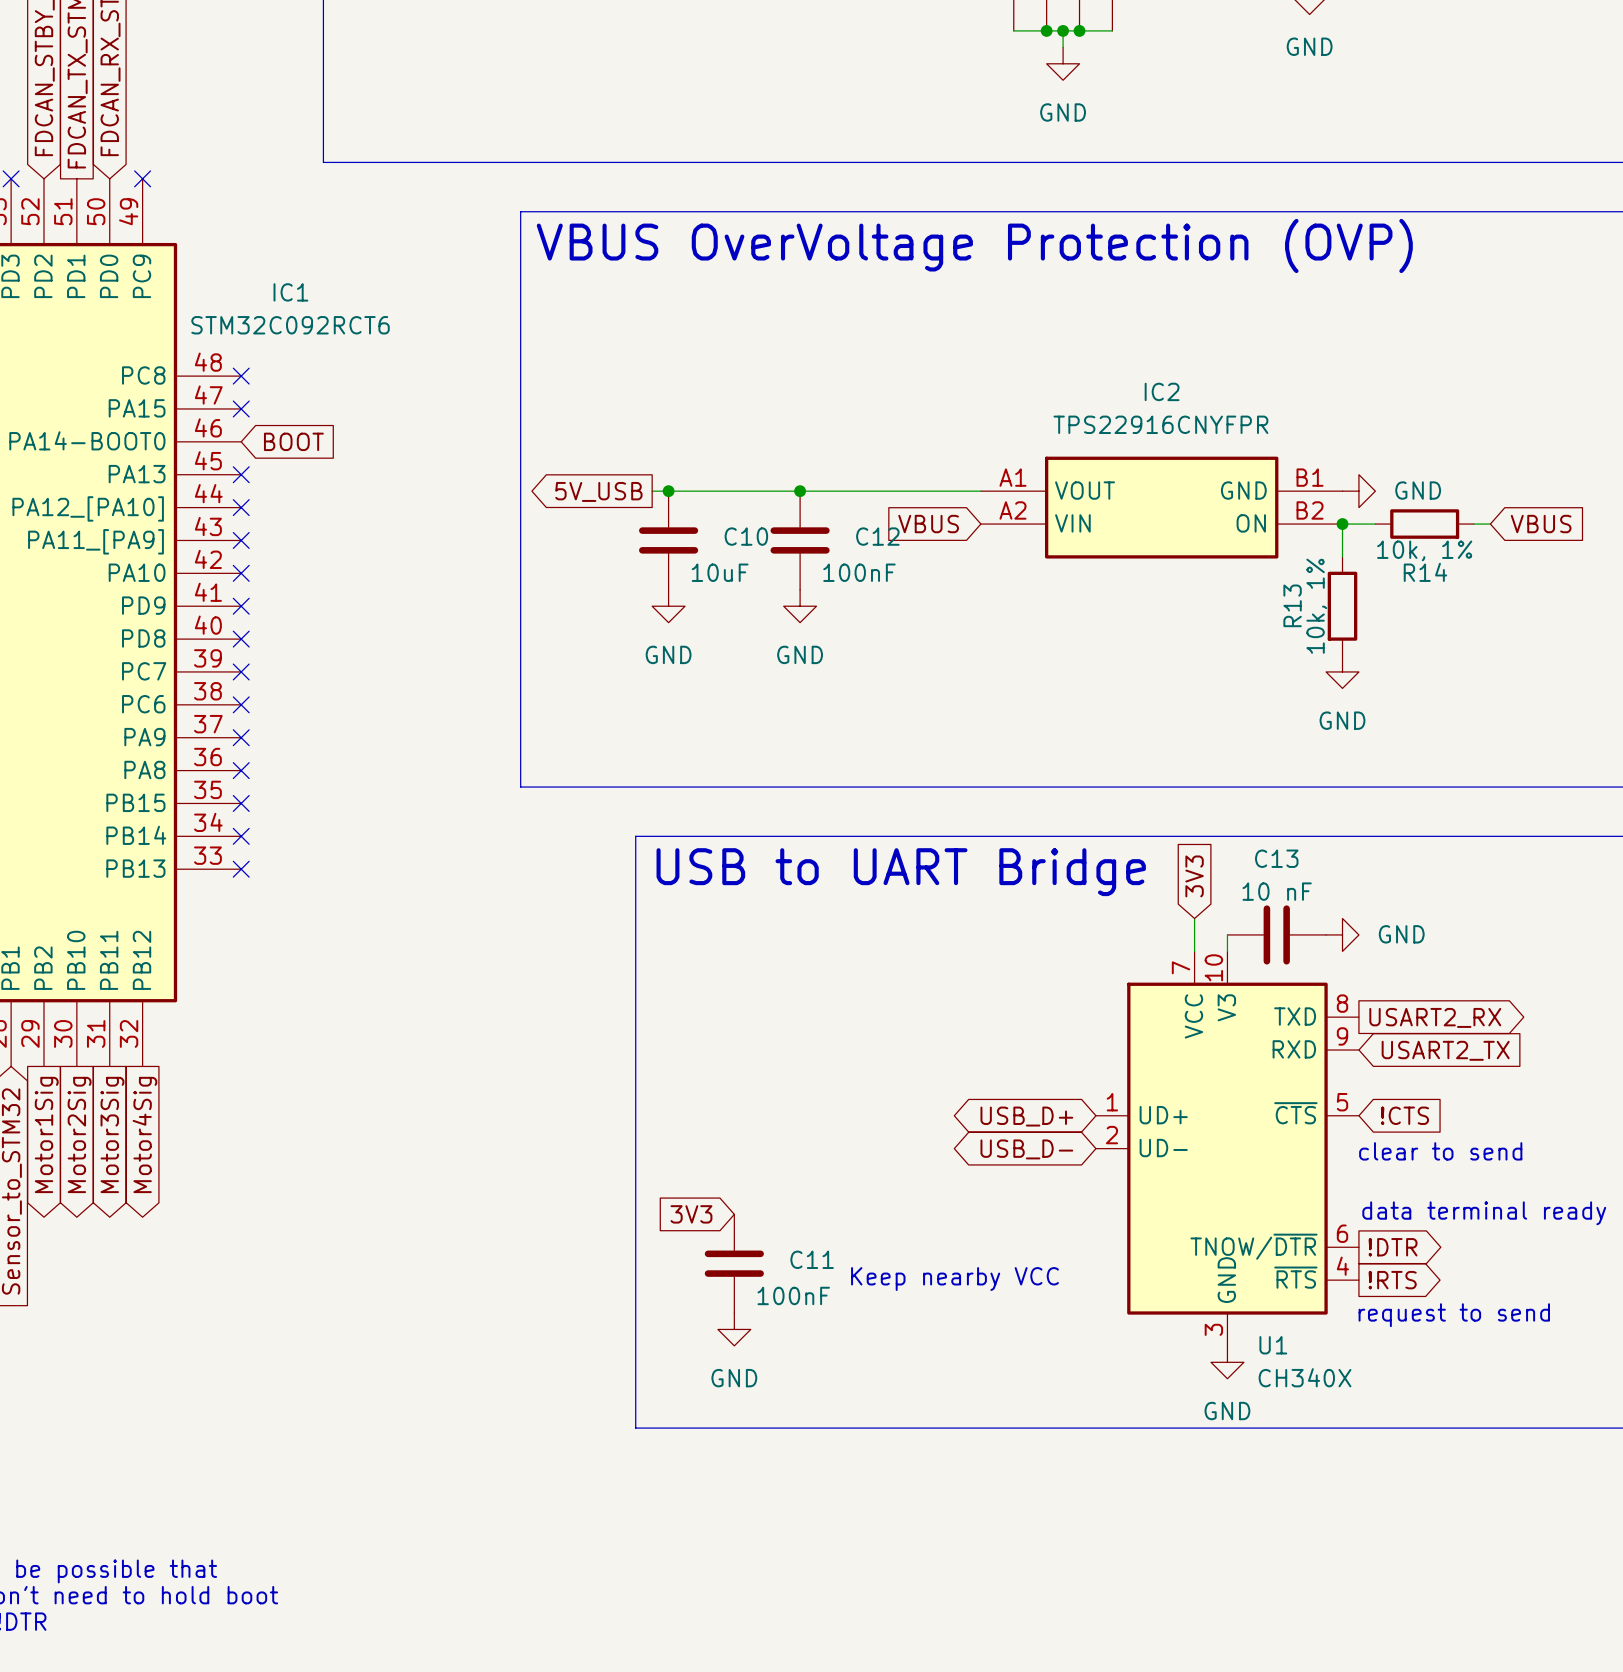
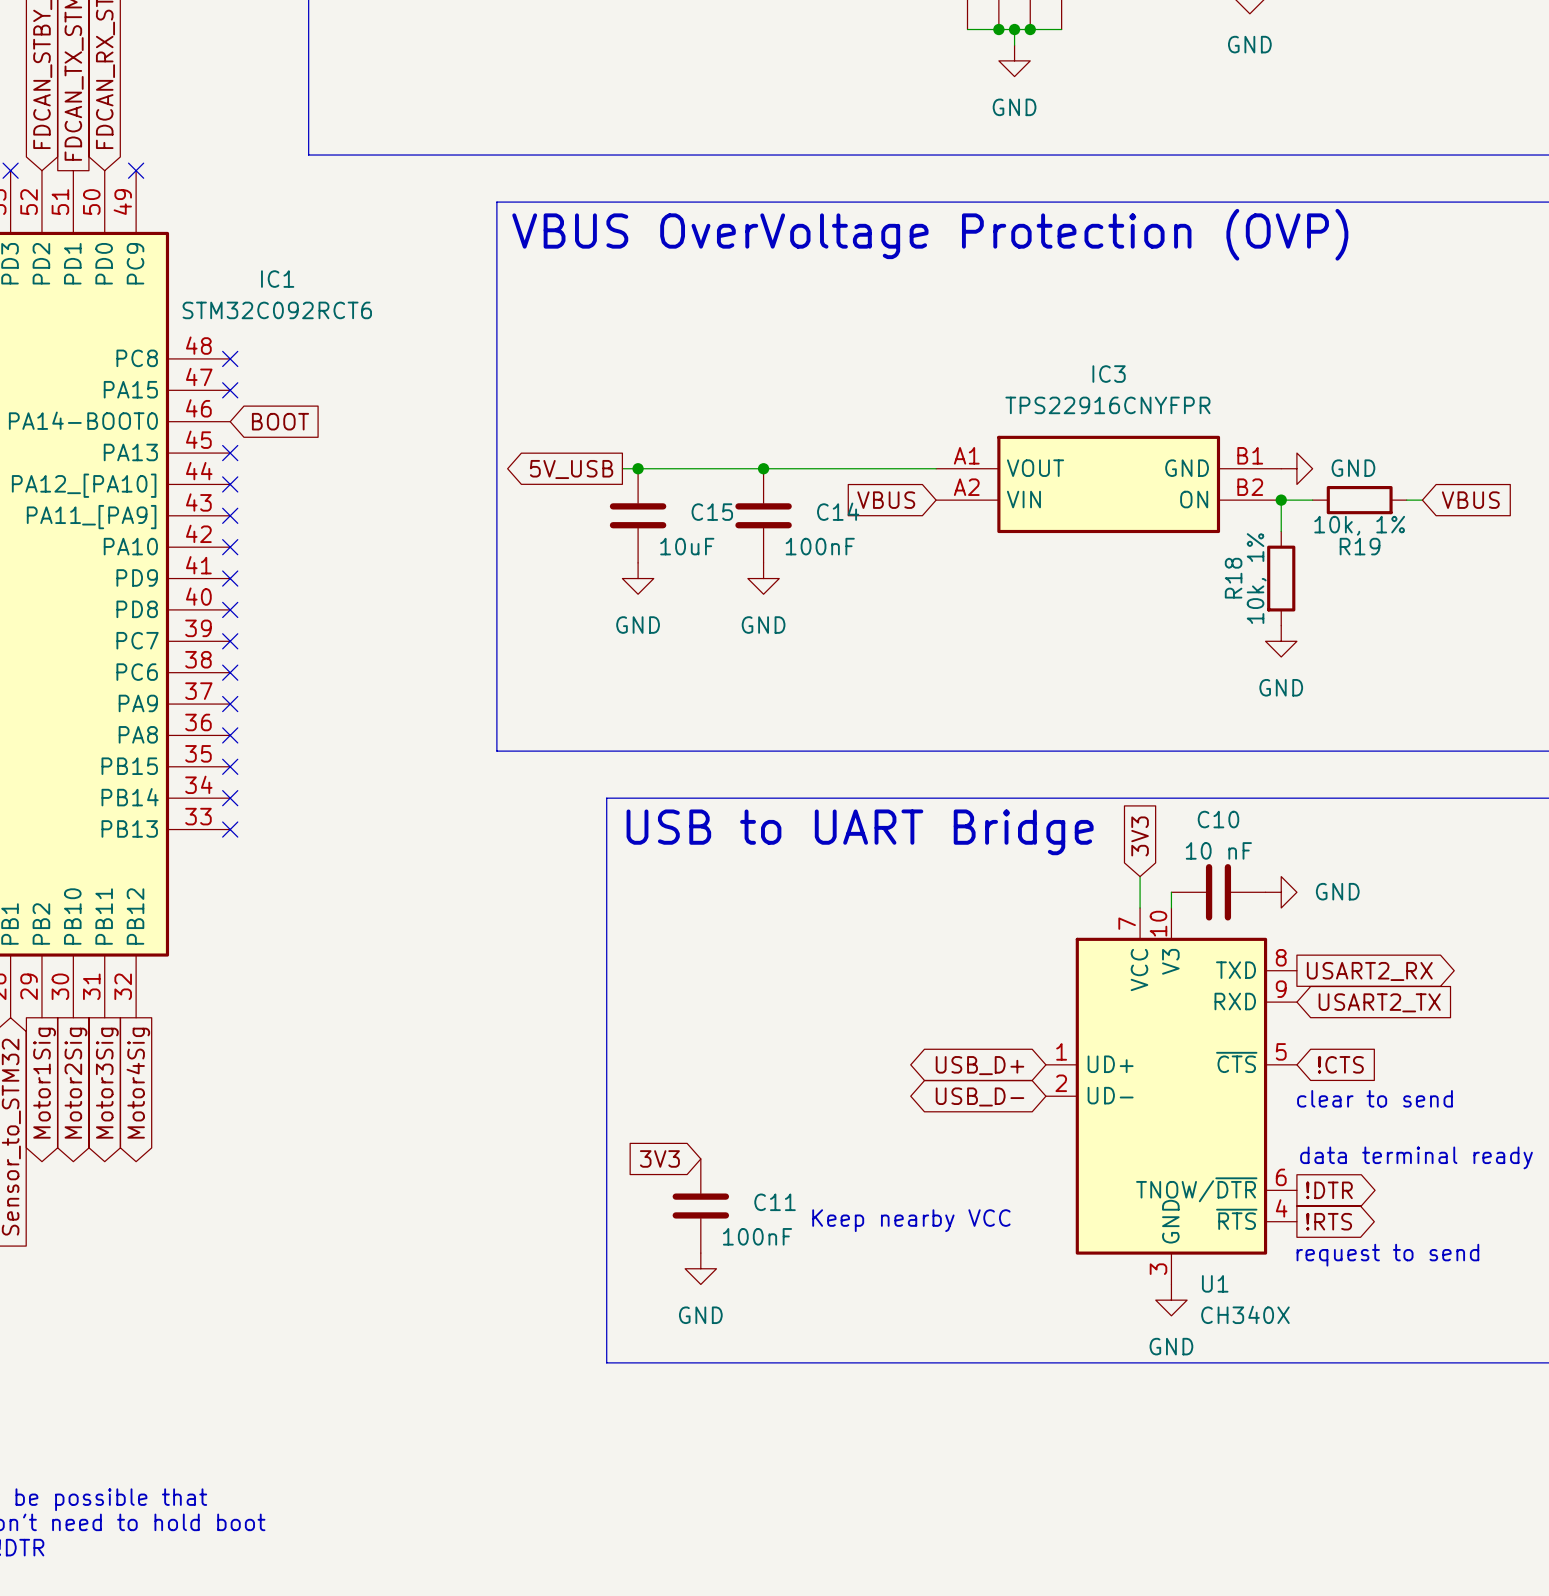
IC2 name: IC2 (1162, 391) -> IC3 (1109, 374)
C10 name: C10 (746, 536) -> C15 (712, 512)
C12 name: C12 (877, 536) -> C14 (838, 511)
R14 name: R14 (1425, 572) -> R19 (1360, 546)
R13 name: R13 (1292, 605) -> R18 (1233, 578)
C13 name: C13 (1276, 858) -> C10 (1218, 819)

